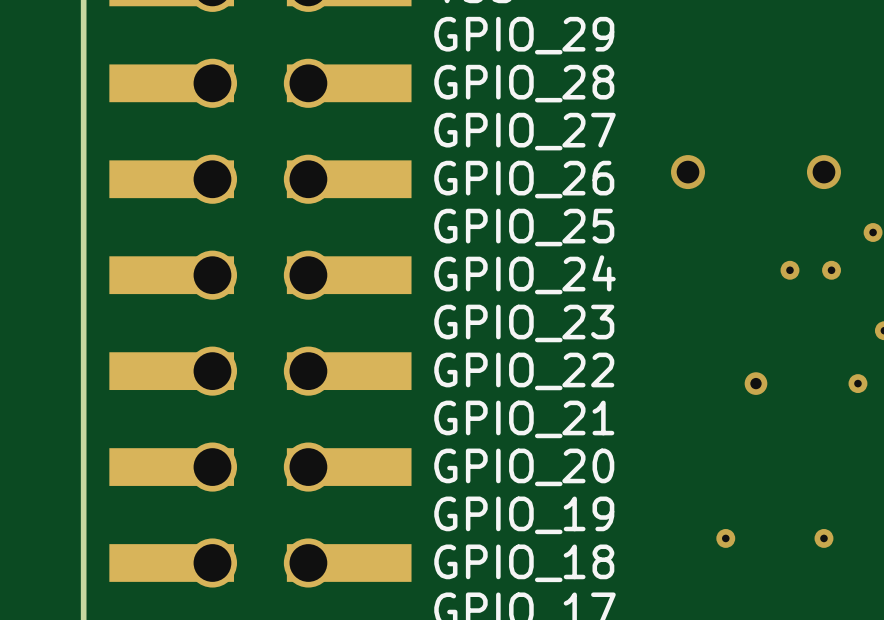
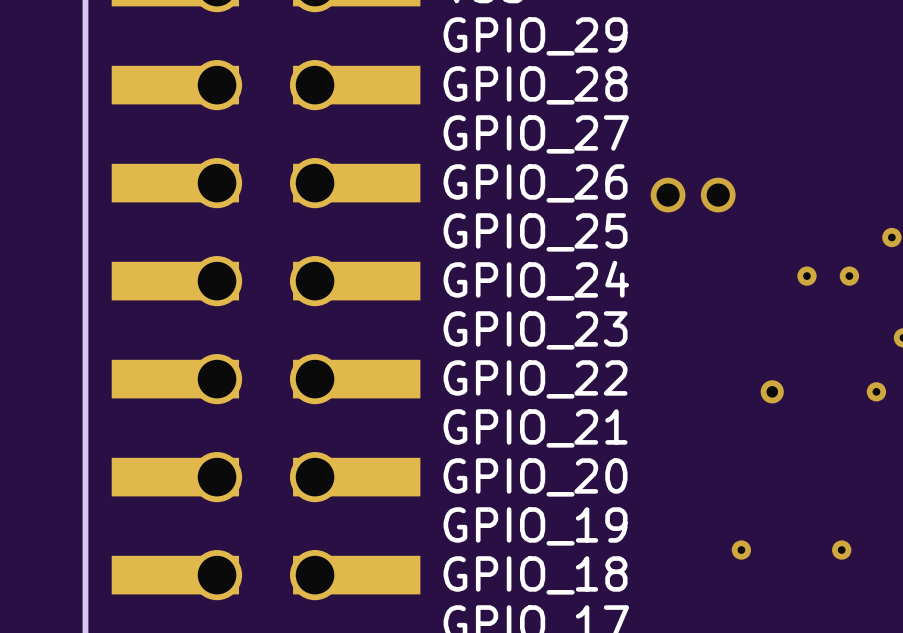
via: (688, 172) -> none
via: (823, 172) -> none
via: none -> (668, 195)
via: none -> (718, 195)

